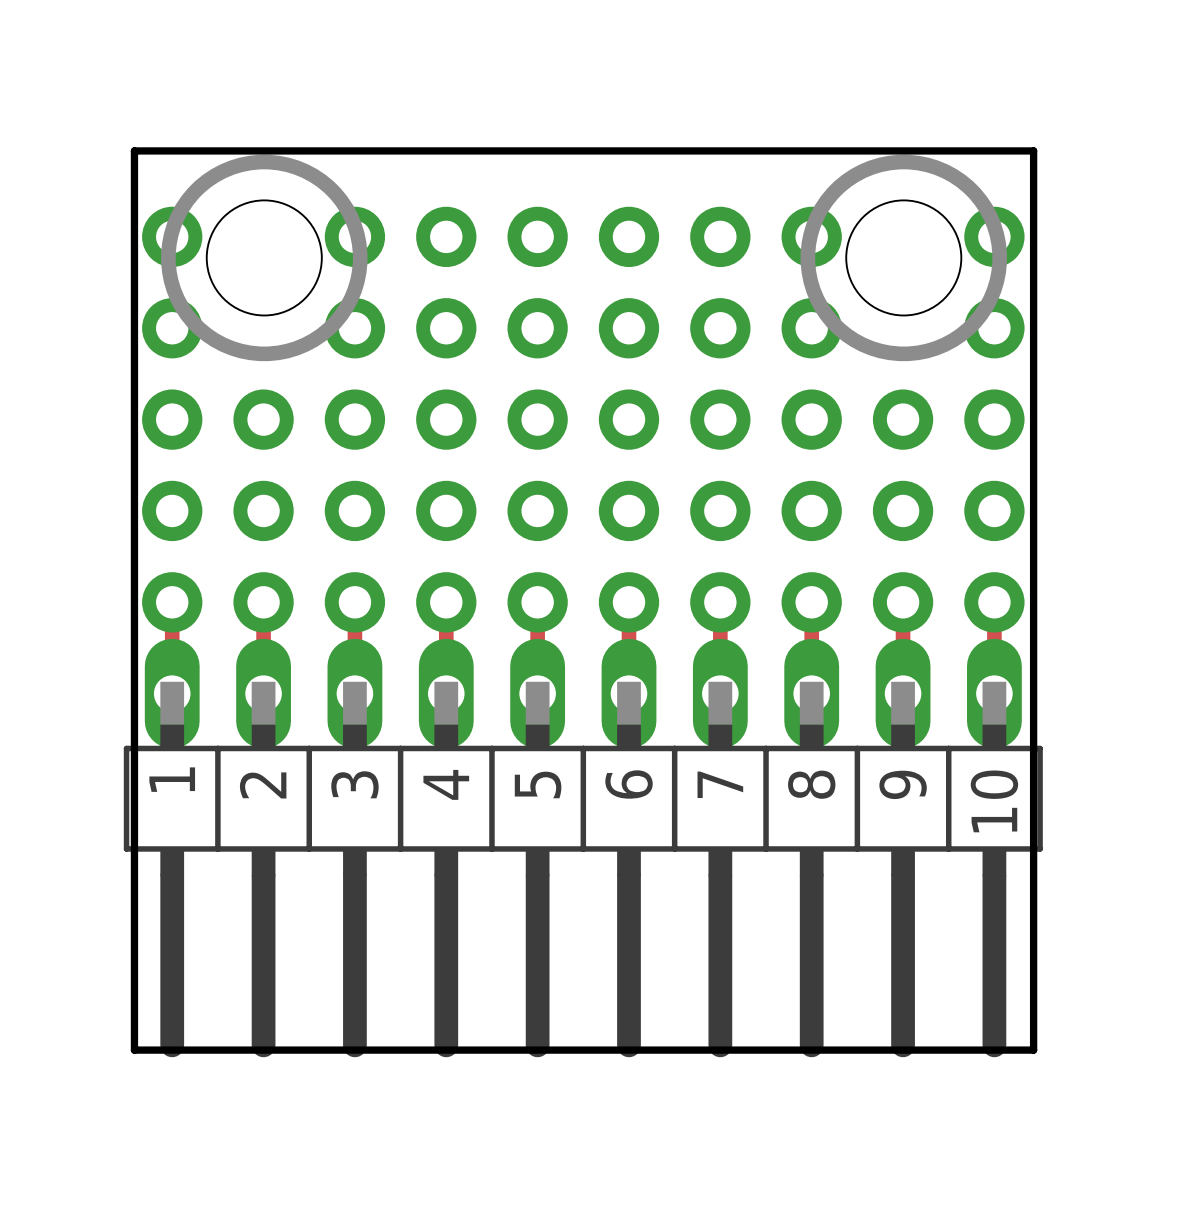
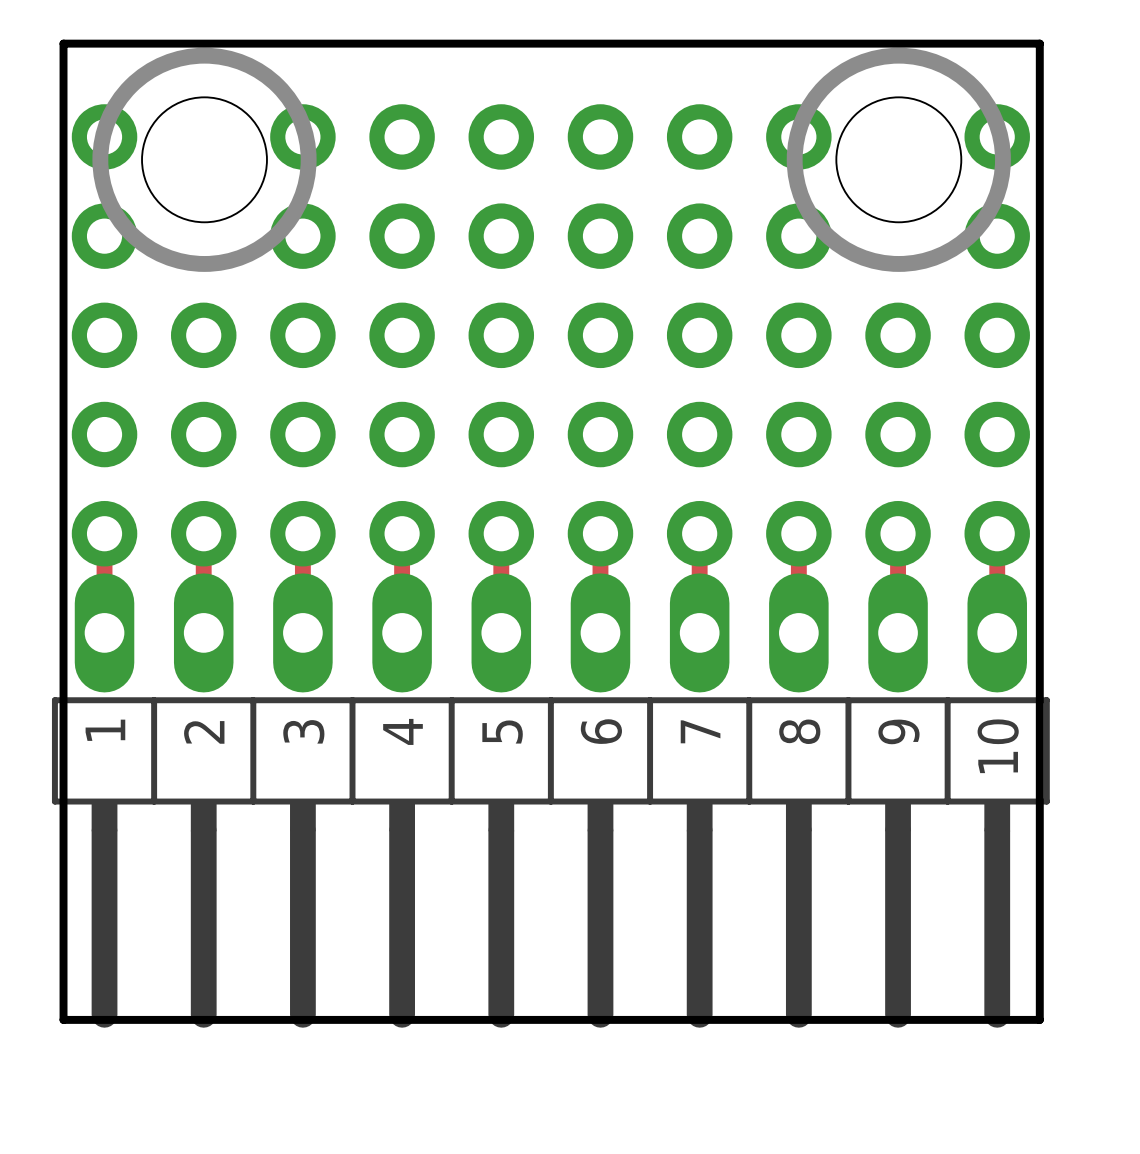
part footprint: [123, 638, 1043, 1058] -> [51, 573, 1050, 1028]

